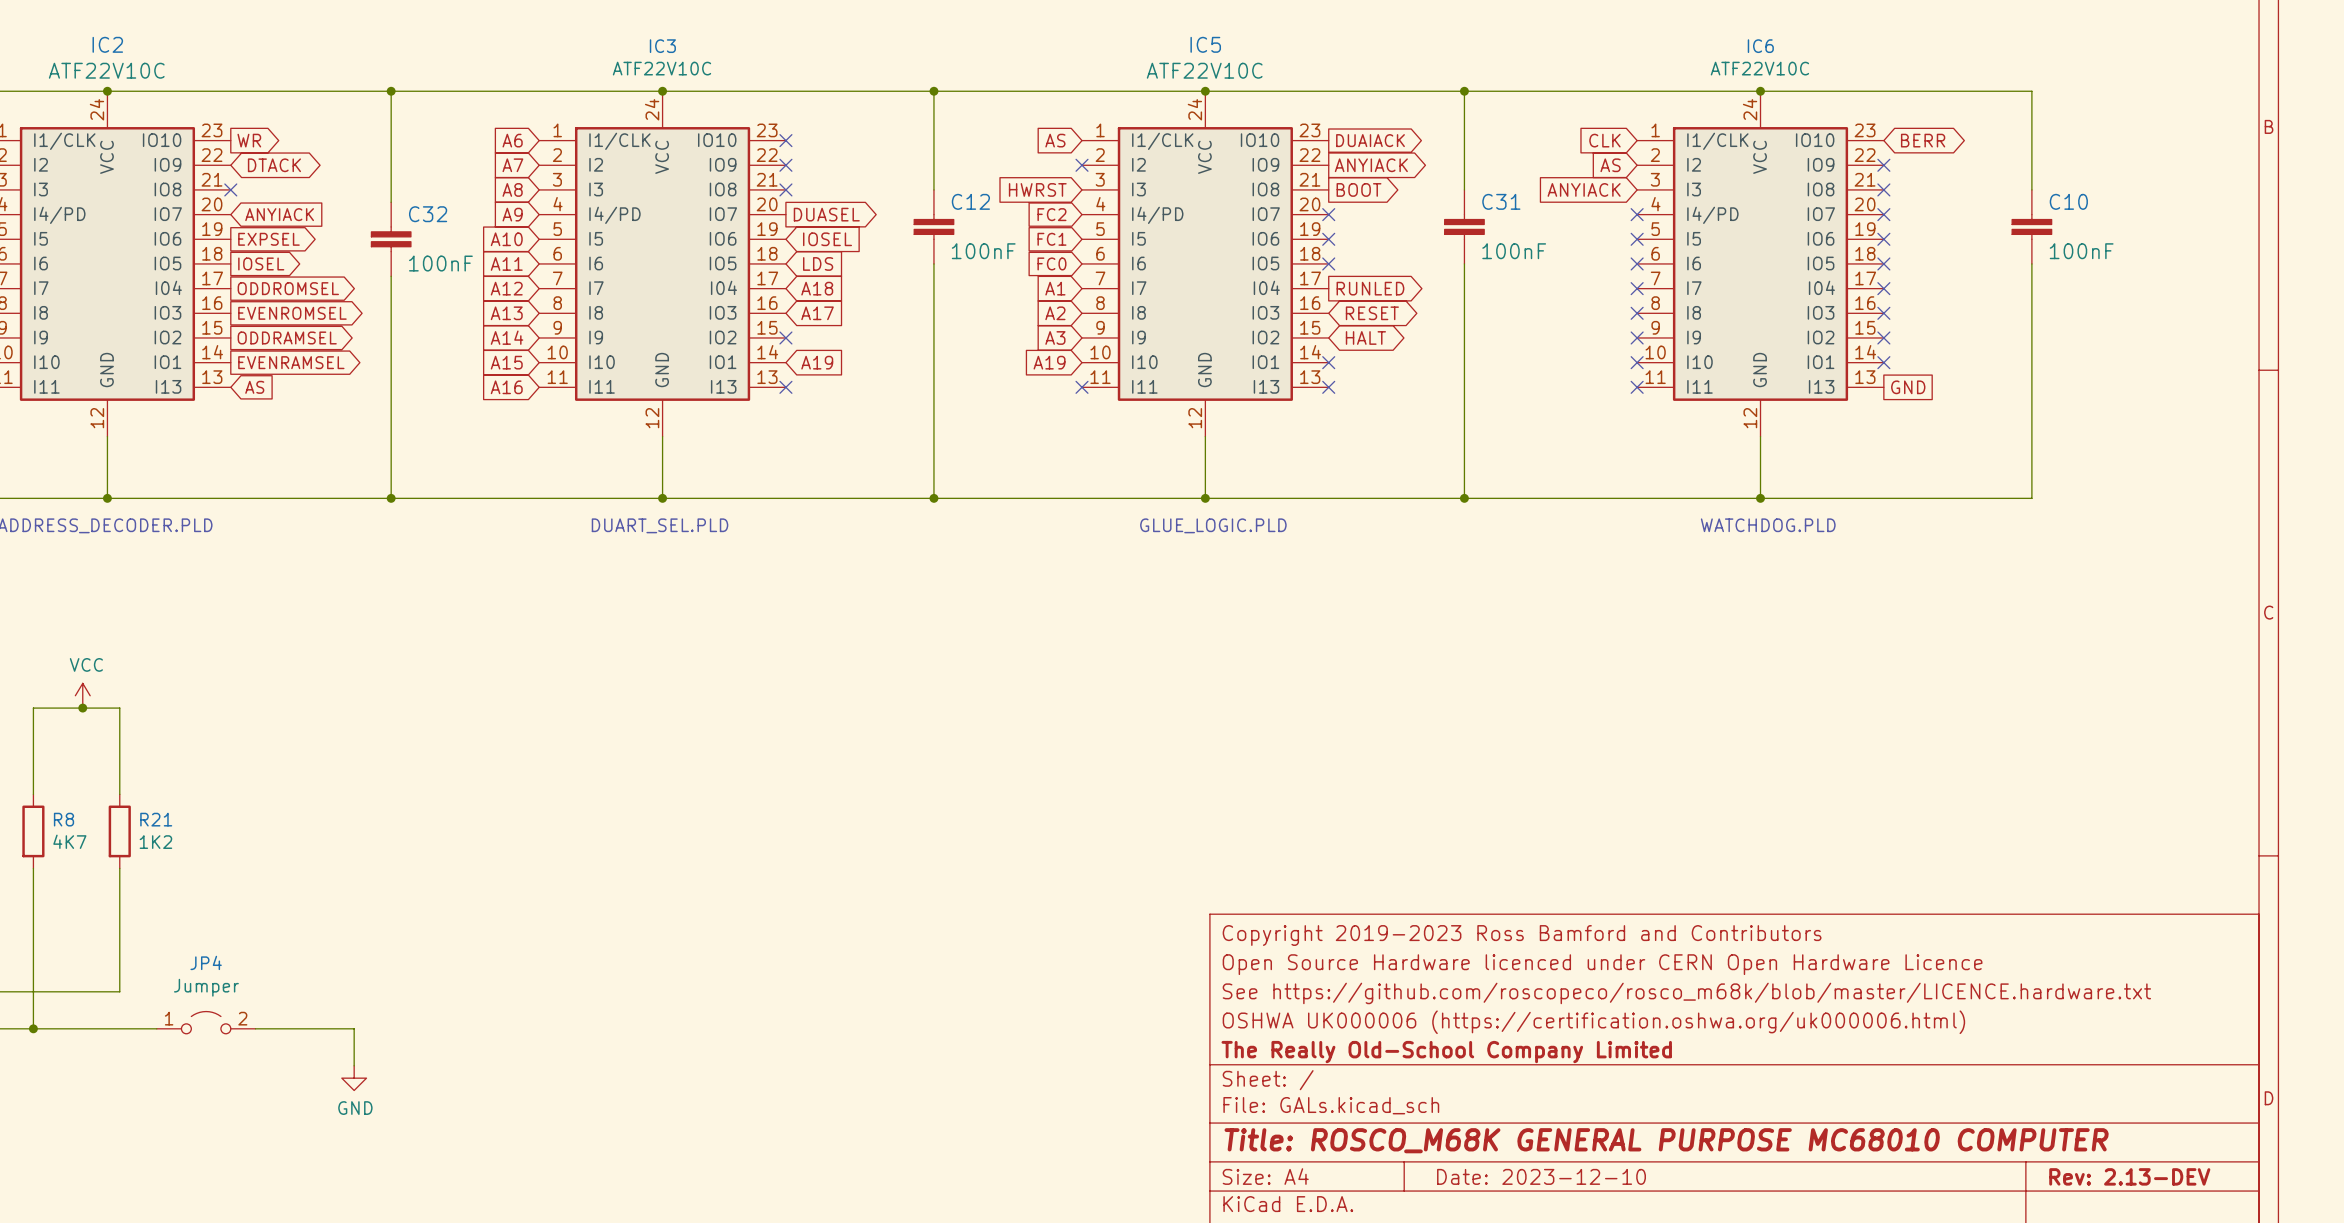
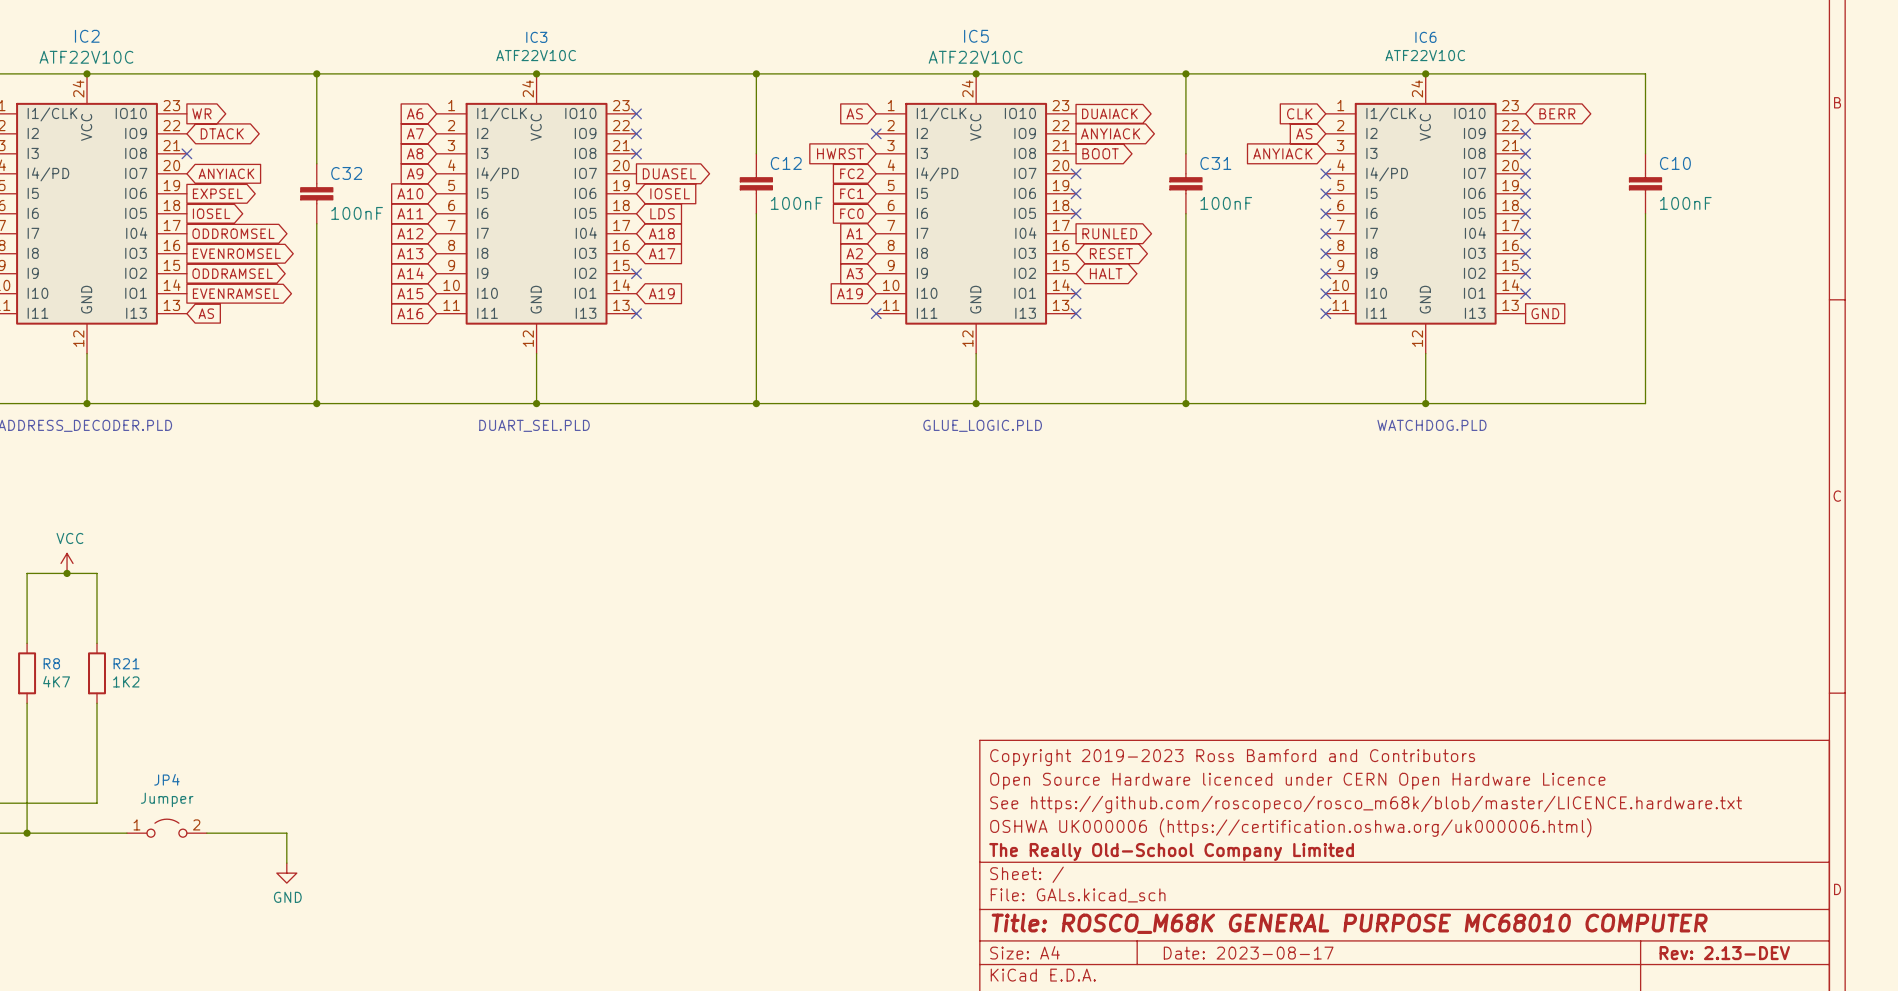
title block: Date: 2023-12-10 (1541, 1176) -> Date: 2023-08-17 (1248, 953)

